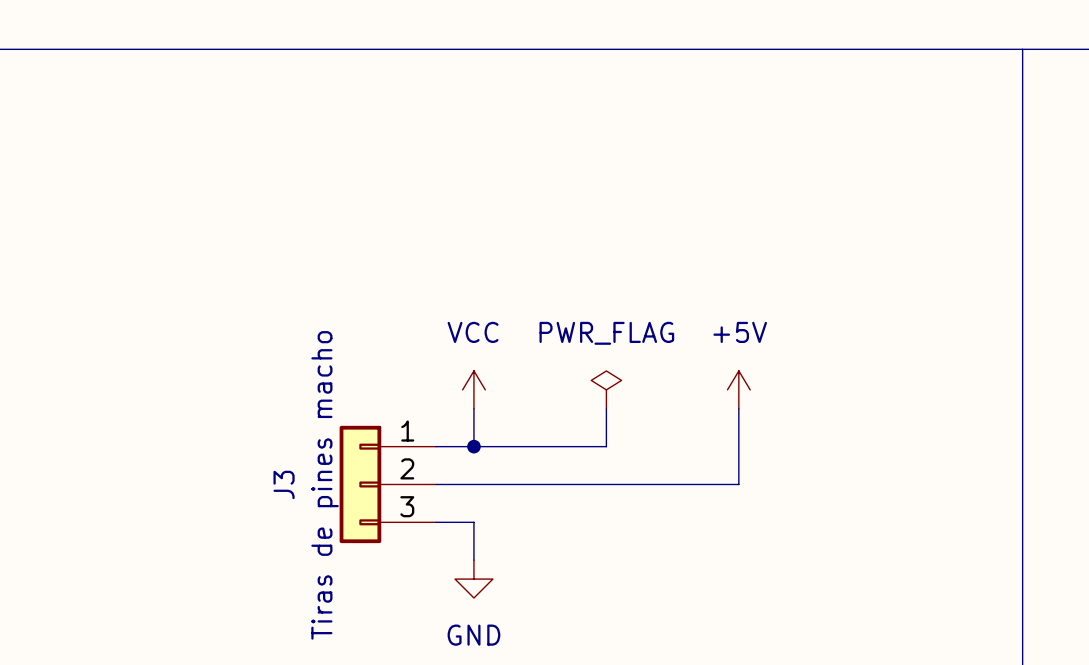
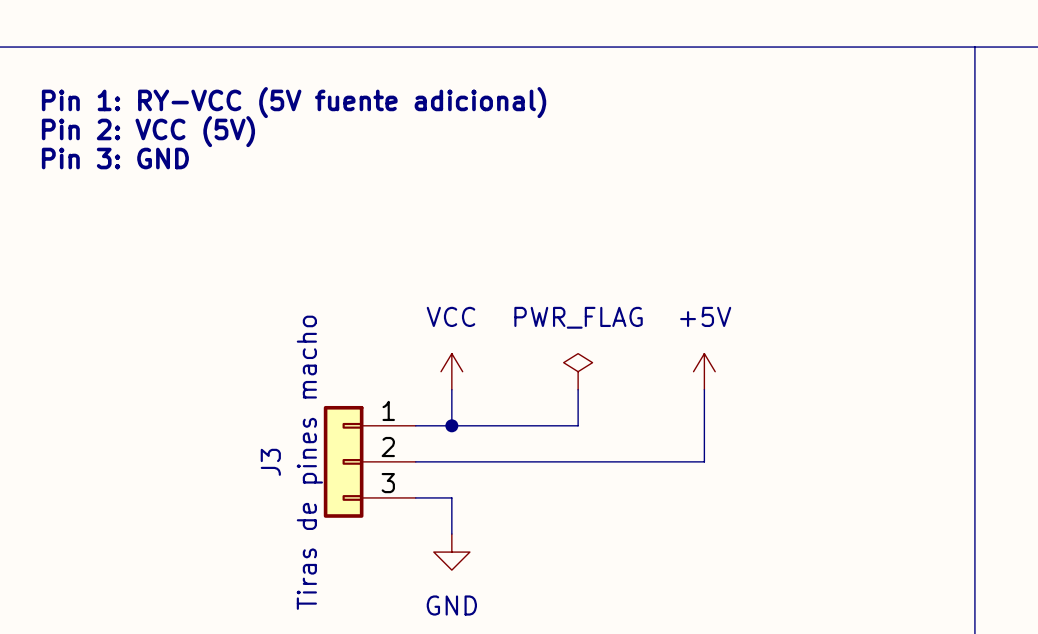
text: none -> Pin 1: RY-VCC (5V fuente adicional) (294, 102)
text: none -> Pin 2: VCC (5V) (148, 131)
text: none -> Pin 3: GND (115, 158)

